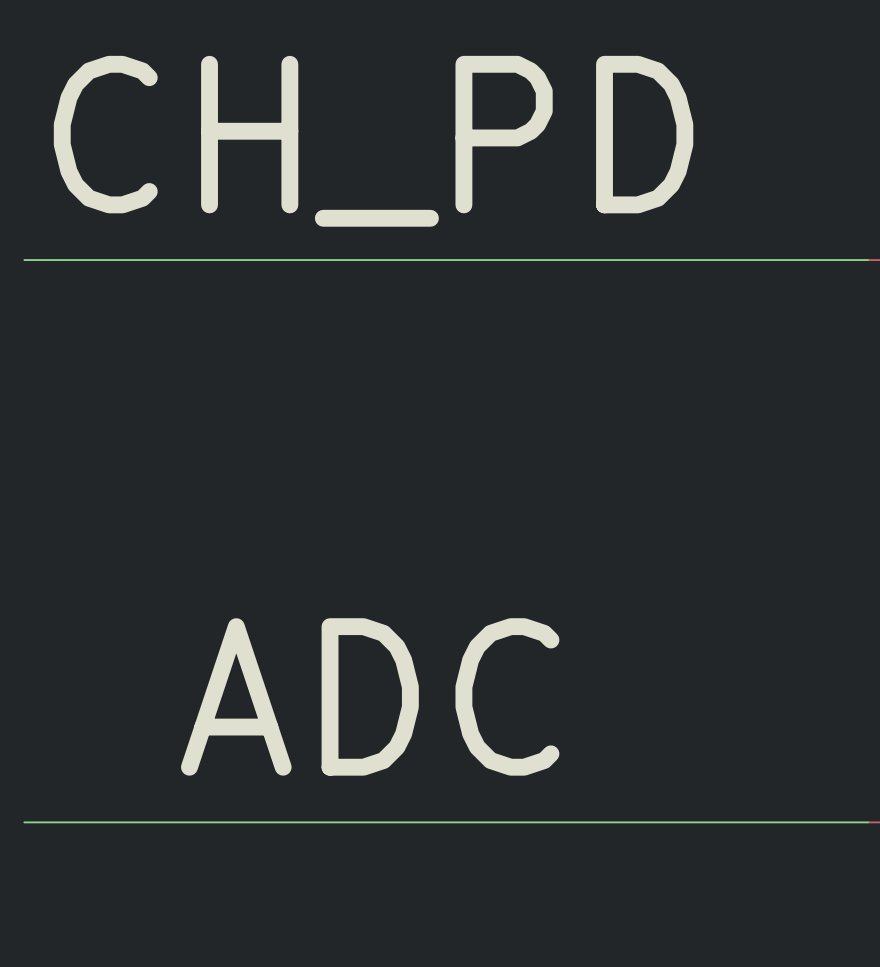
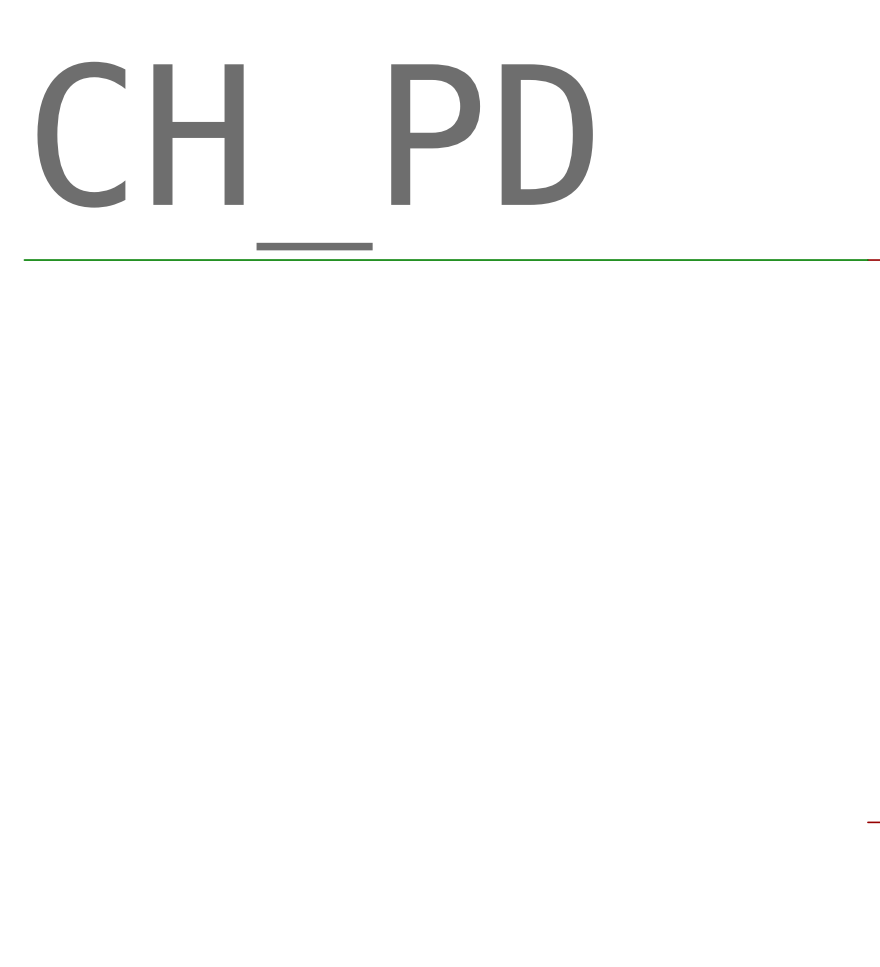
label: ADC (370, 696) -> none
wire: (24, 822) (867, 822) -> none

